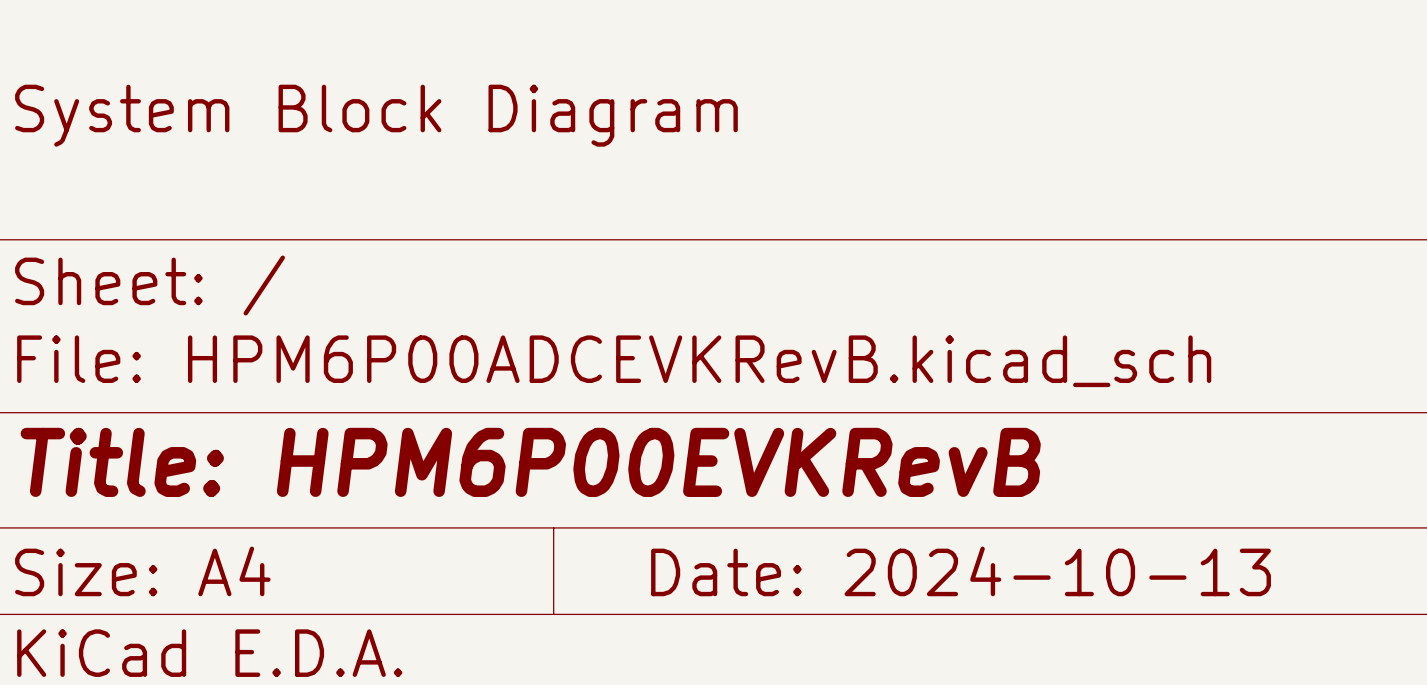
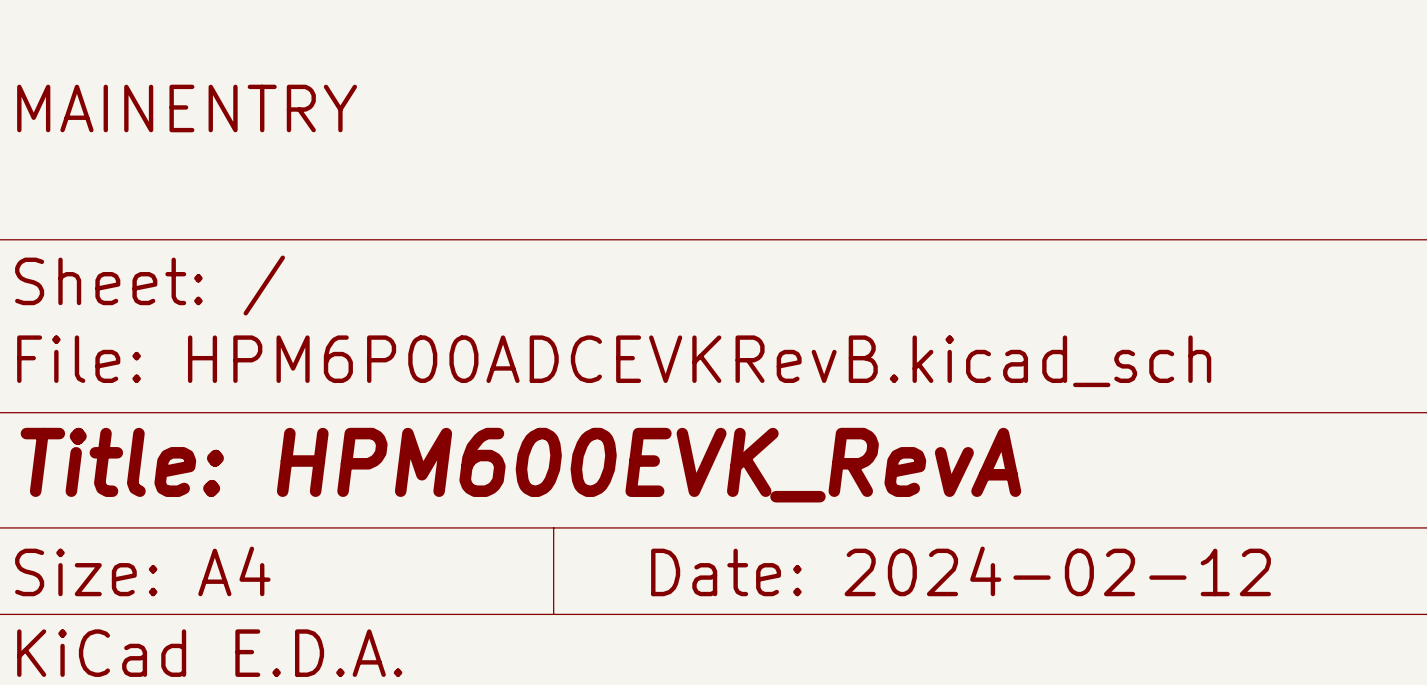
title block: System Block Diagram (376, 115) -> MAINENTRY (187, 108)
title block: Title: HPM6P00EVKRevB (530, 462) -> Title: HPM600EVK_RevA (520, 465)
title block: Date: 2024-10-13 (961, 571) -> Date: 2024-02-12 (961, 571)

